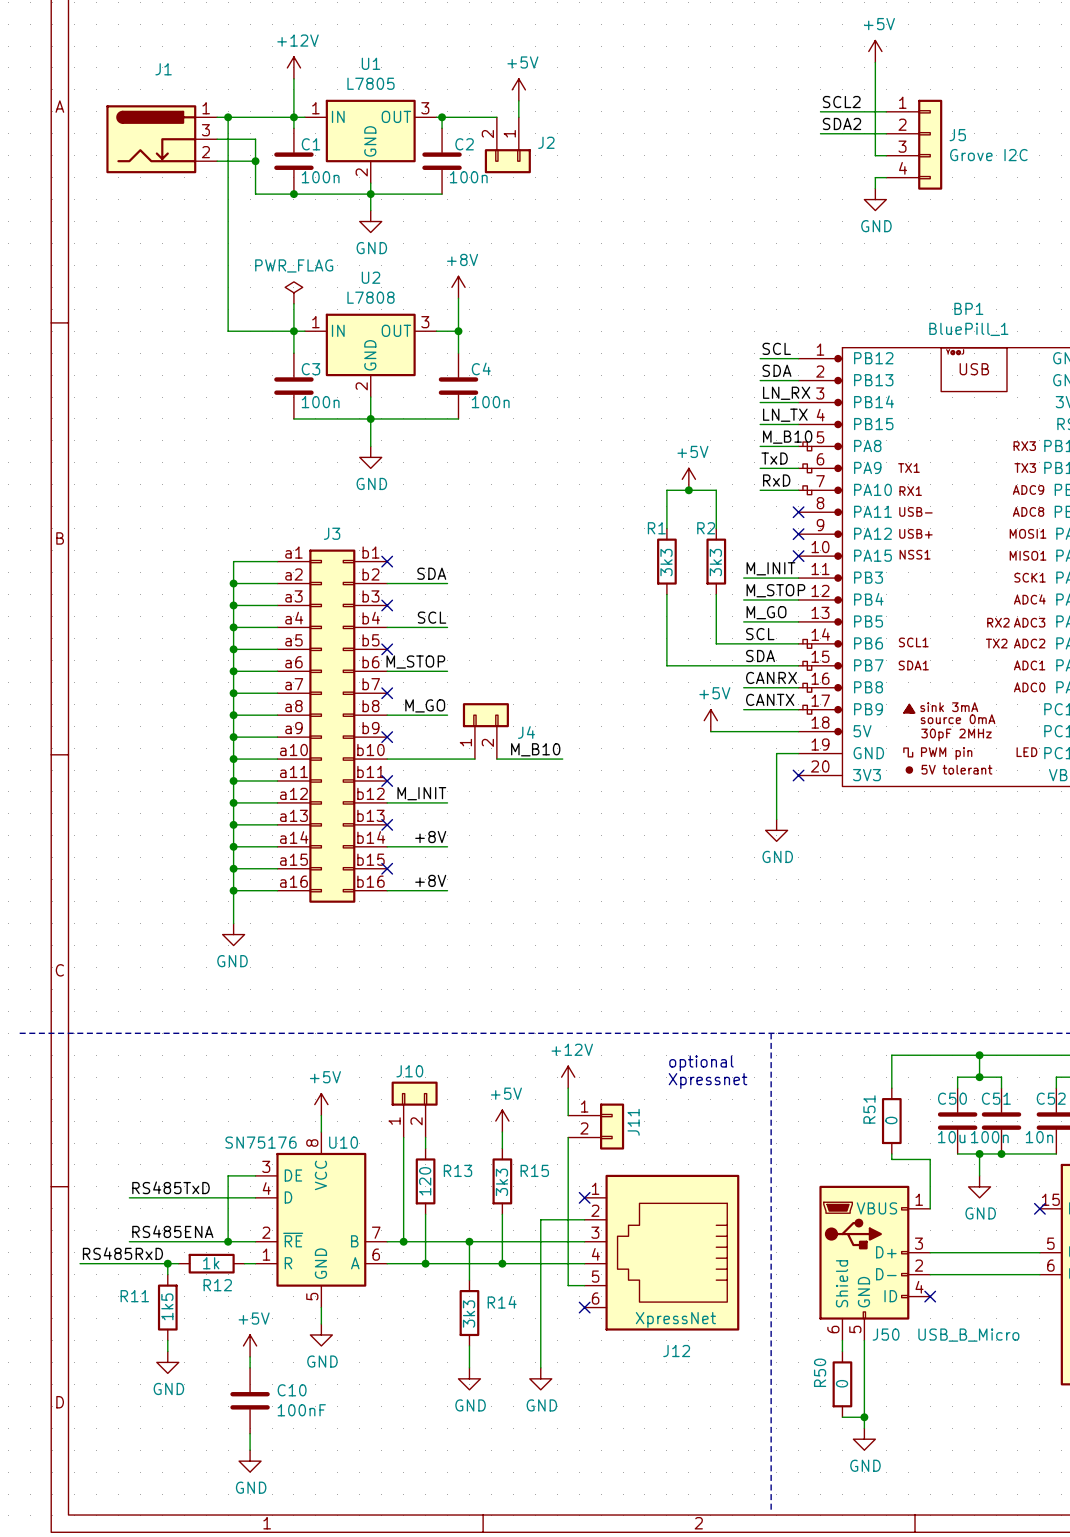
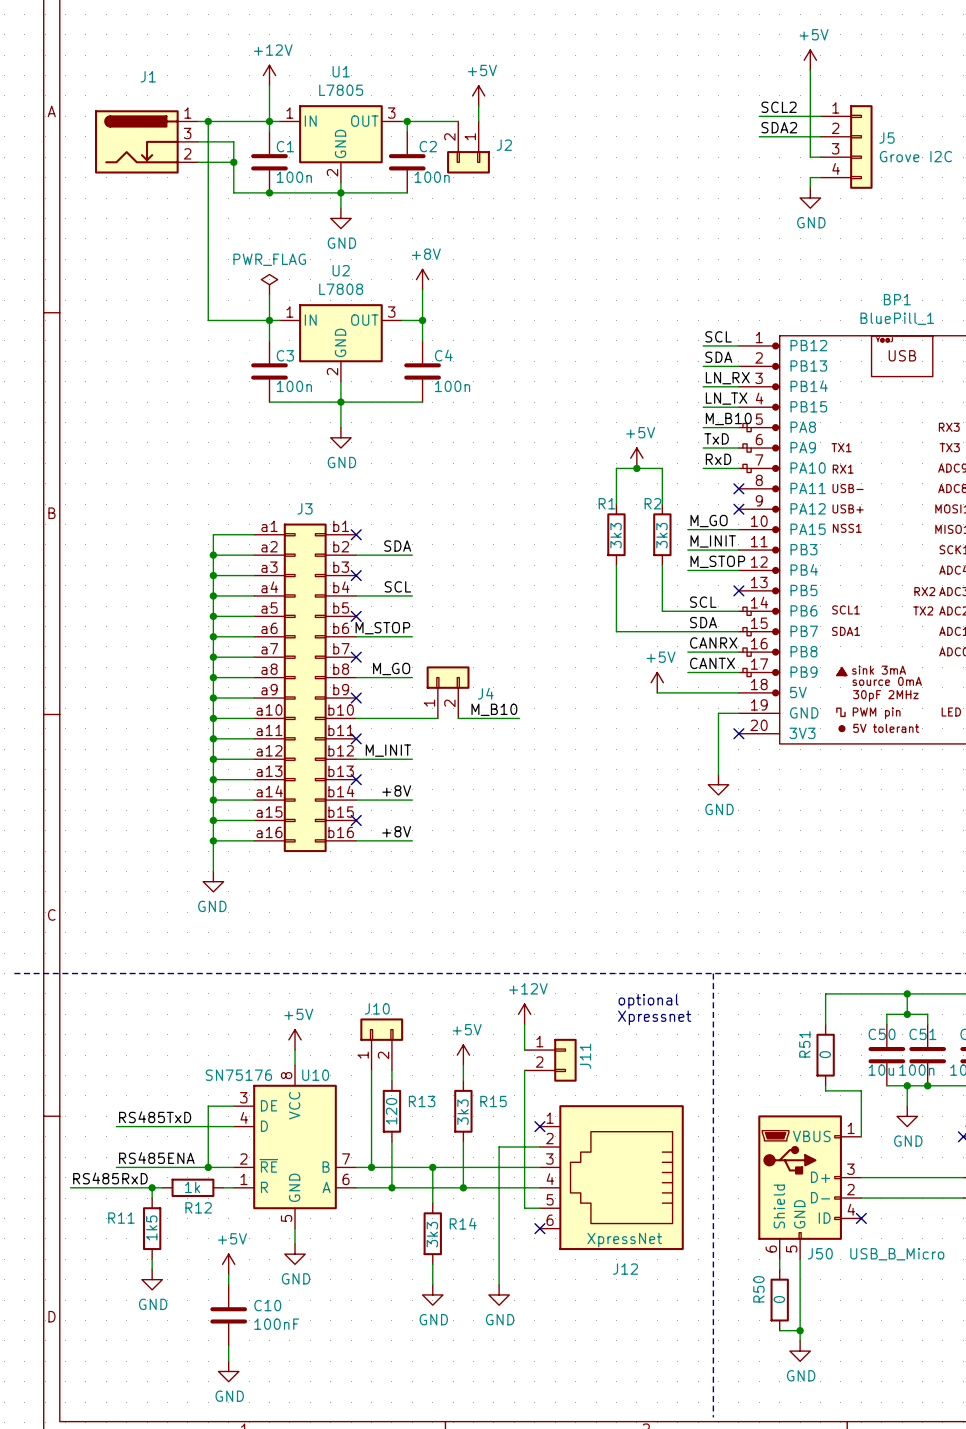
no-connect mark: (798, 556) -> none
label position: M_GO (766, 612) -> M_GO (709, 521)
wire: (743, 621) (798, 621) -> (687, 529) (738, 529)
no-connect mark: none -> (738, 590)

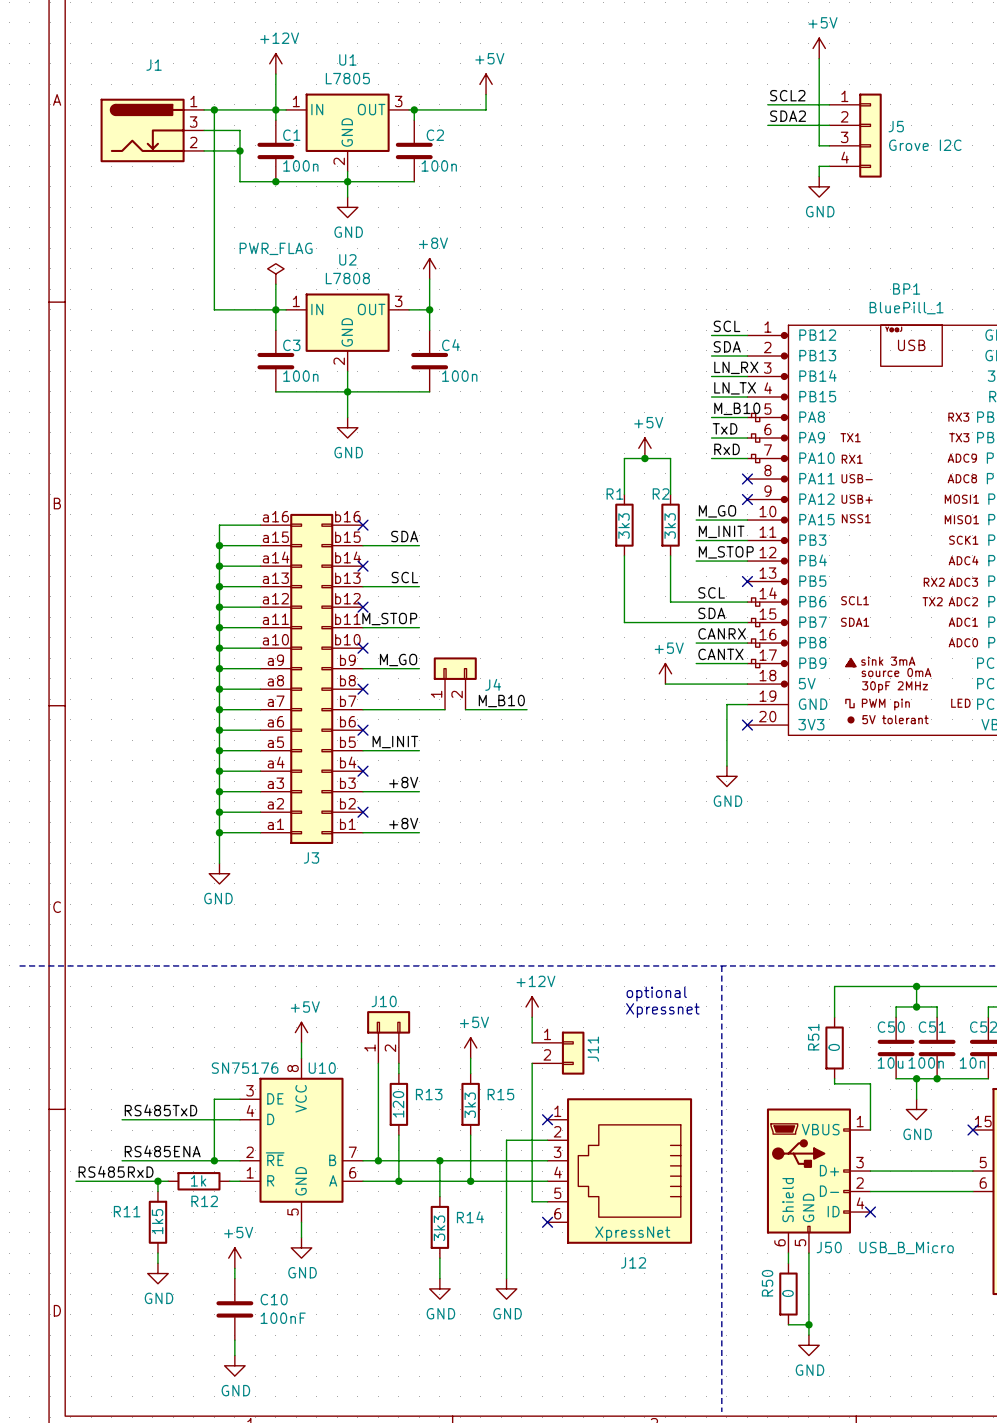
wire: none -> (465, 109) (486, 109)
J2: (468, 147) -> none
J3 flip: as is (305, 687) -> up-down (311, 678)

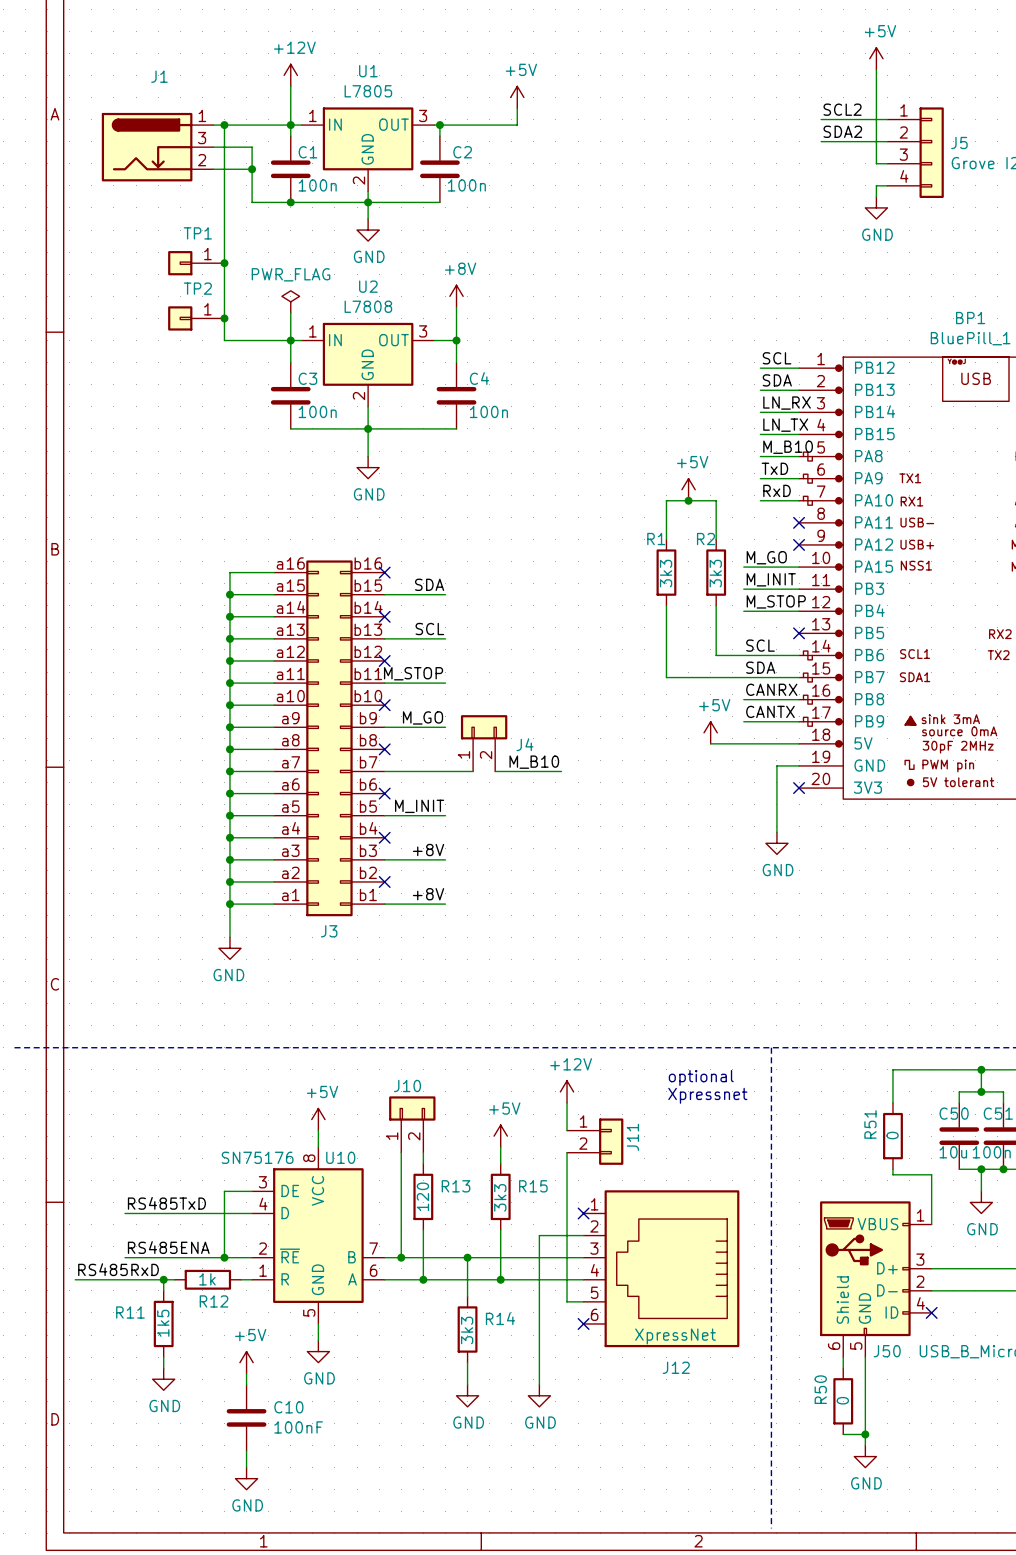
TP1: none -> (196, 263)
junction: none -> (224, 263)
TP2: none -> (196, 318)
junction: none -> (224, 318)

